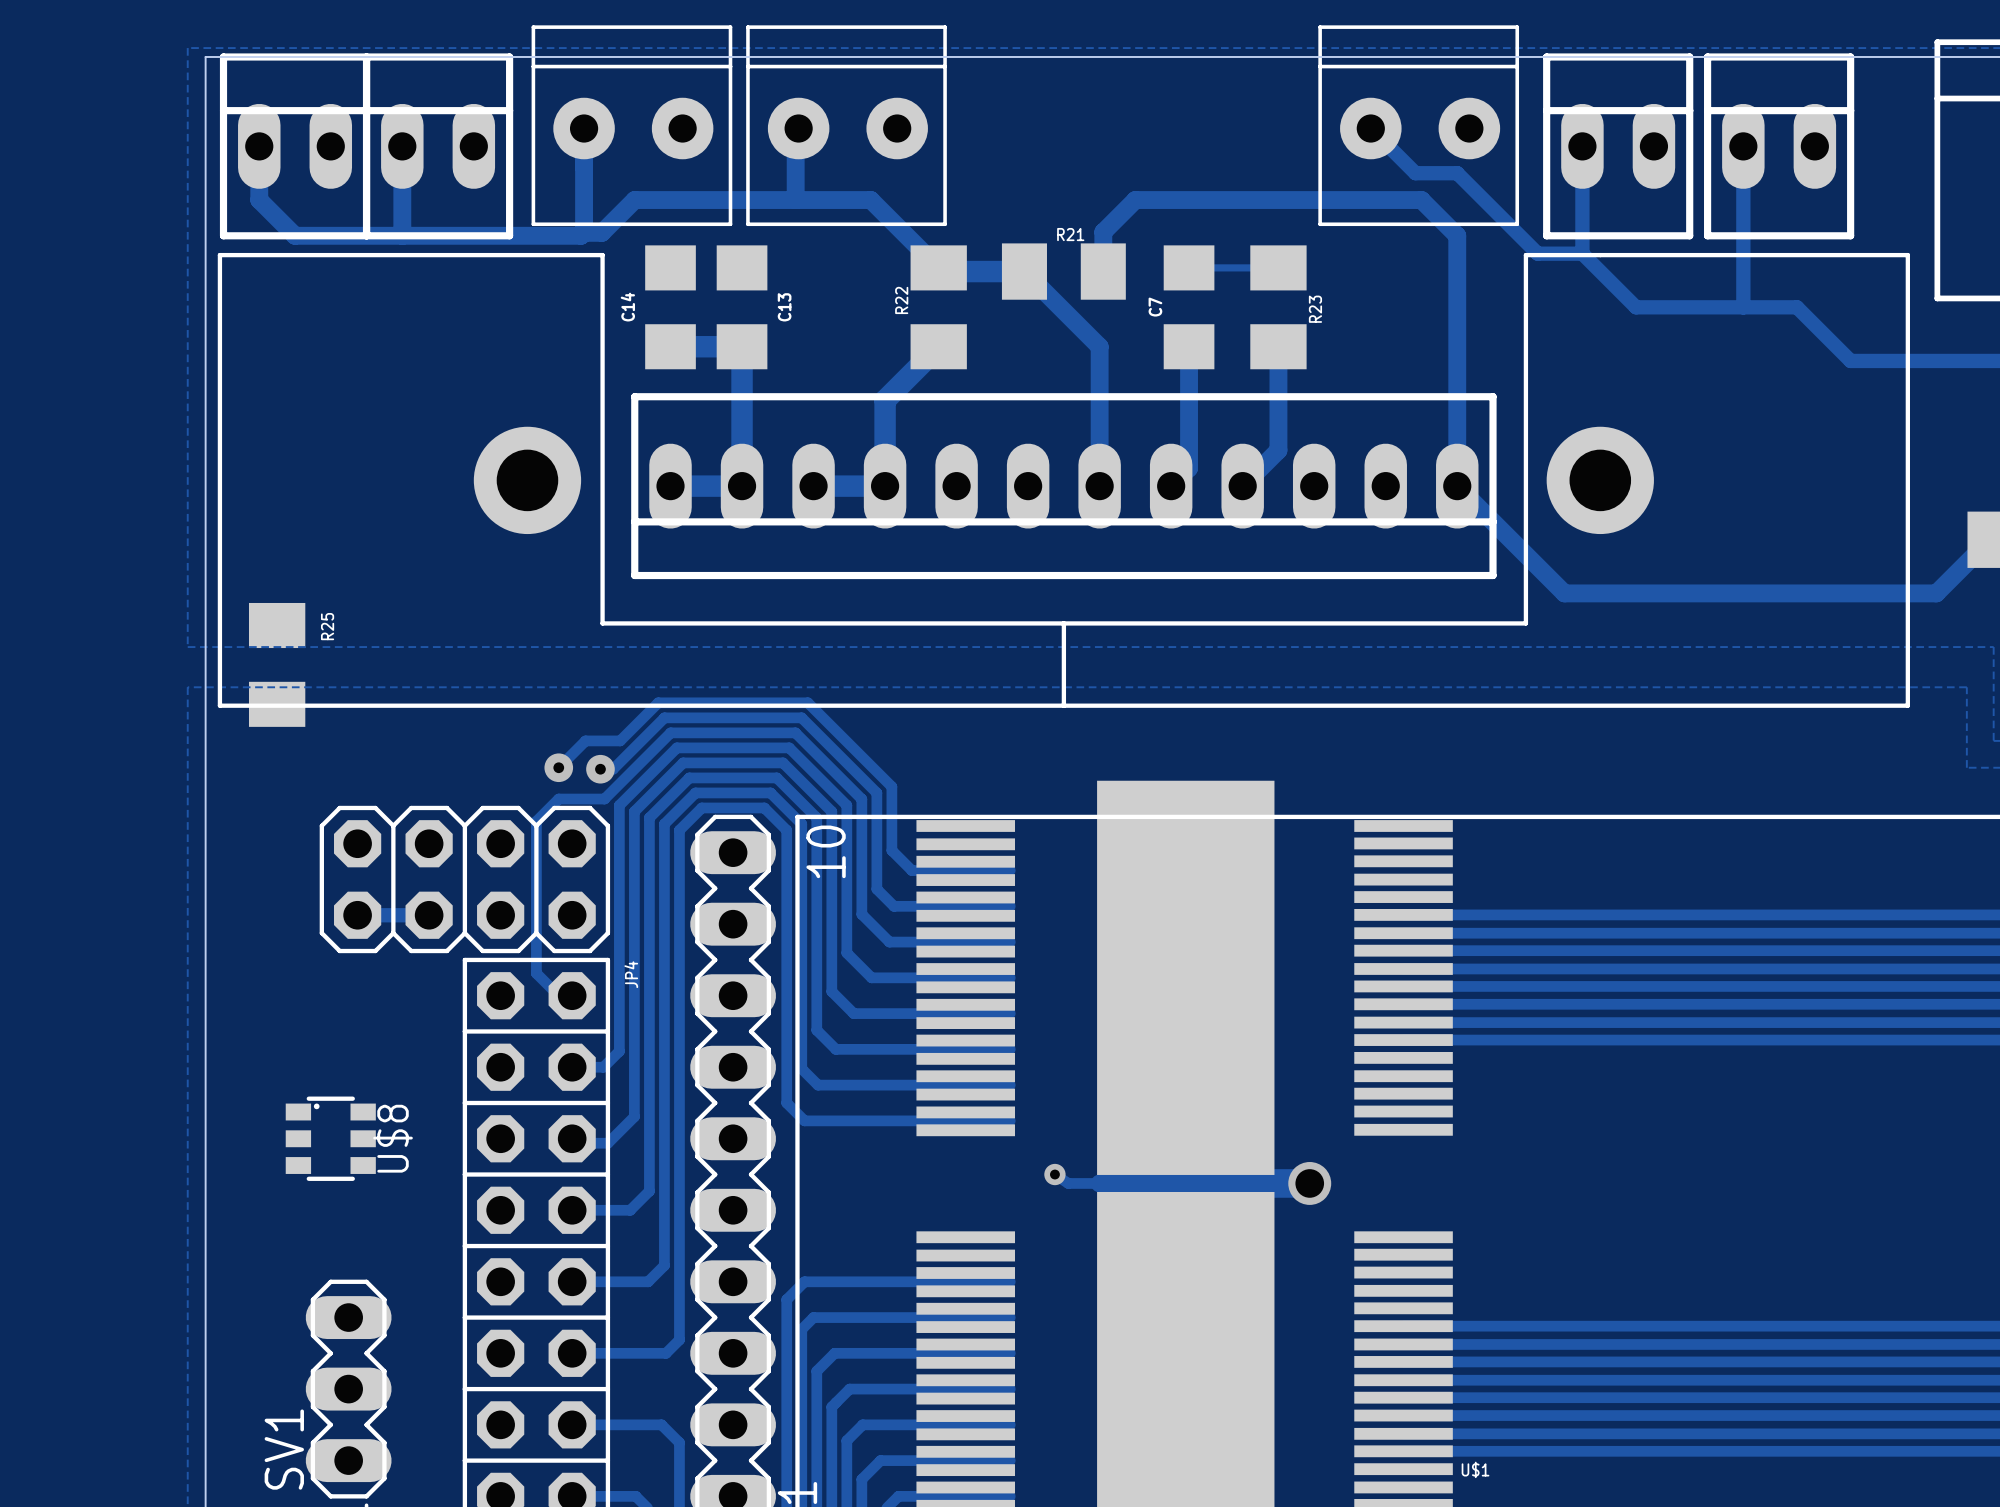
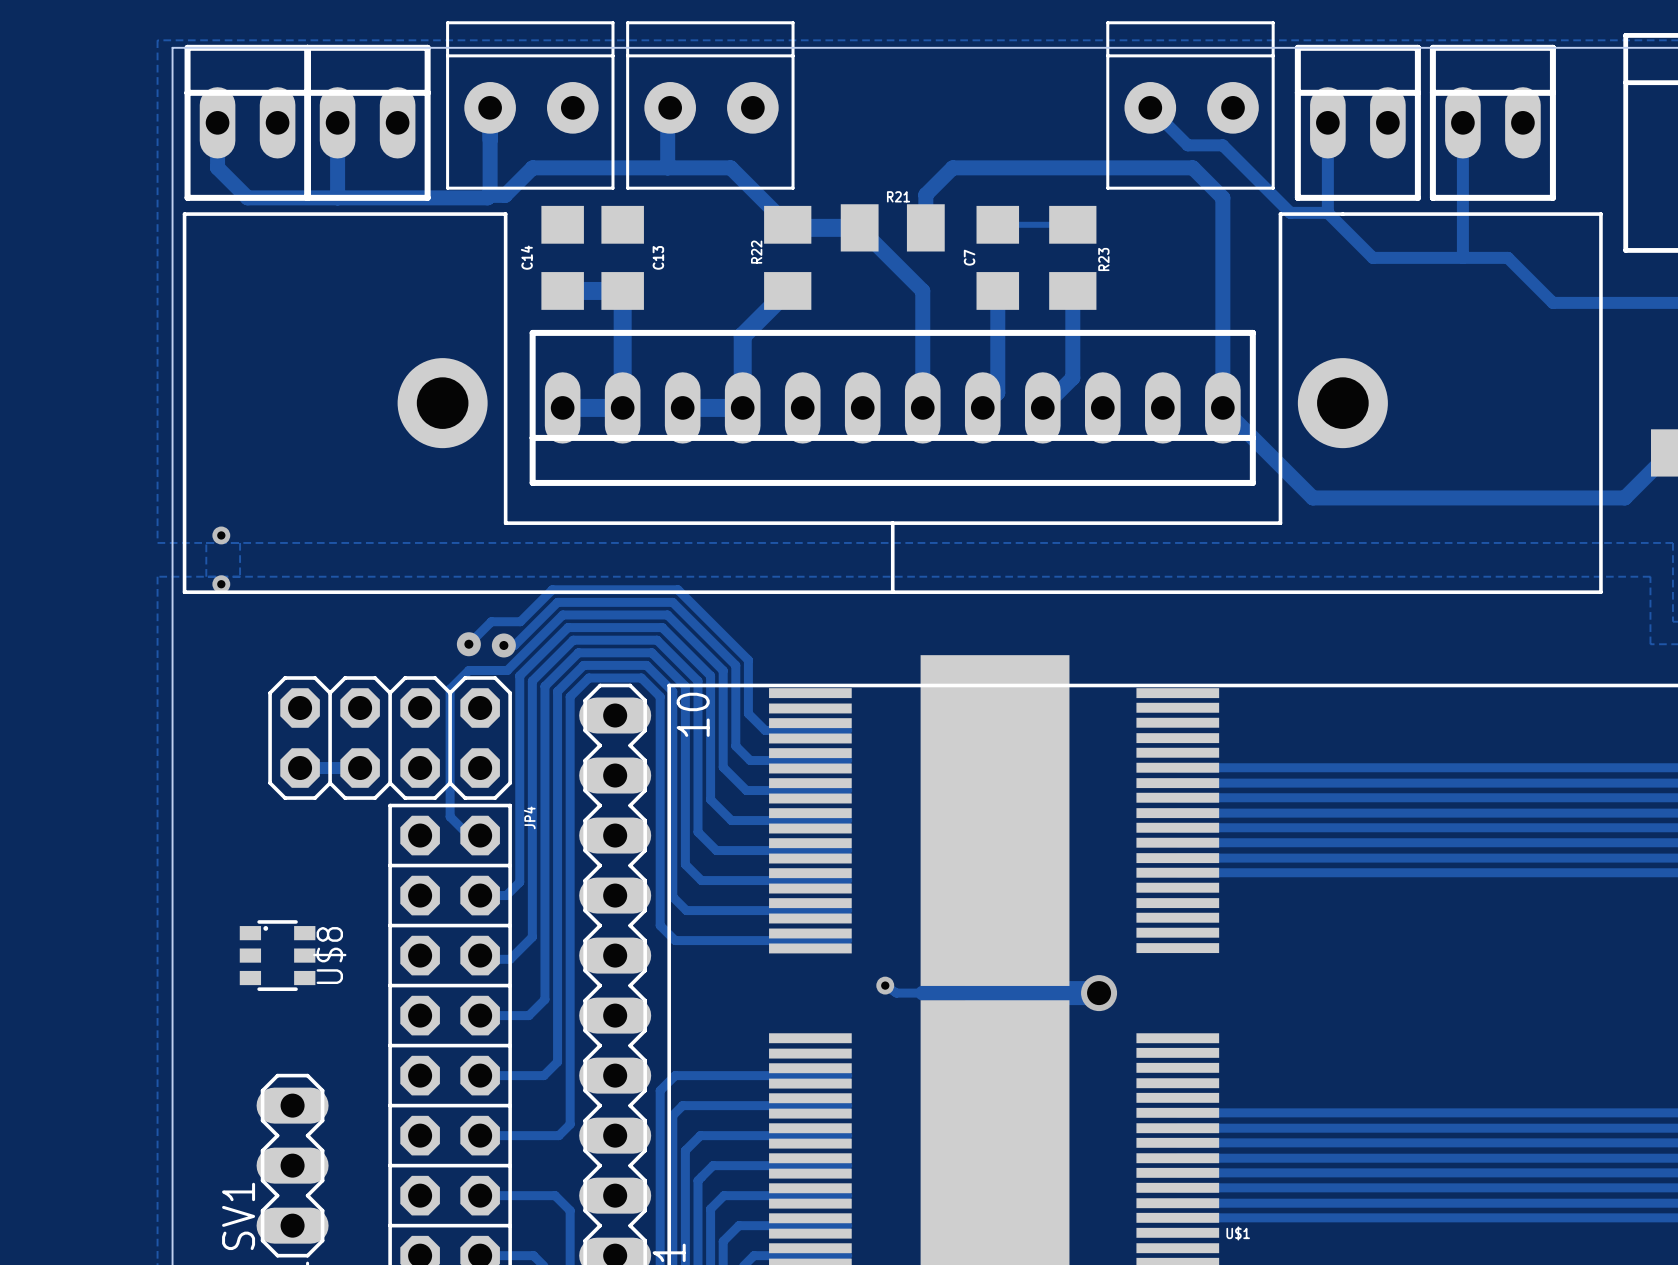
via: none -> (221, 535)
zone outline: none -> (206, 542) (206, 576)
zone outline: none -> (240, 542) (240, 576)
R25: (277, 664) -> none
via: none -> (221, 584)

